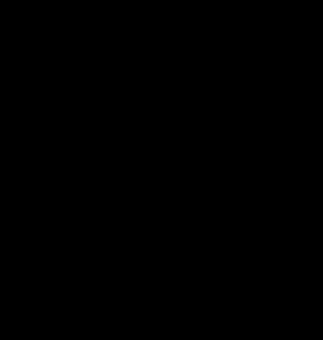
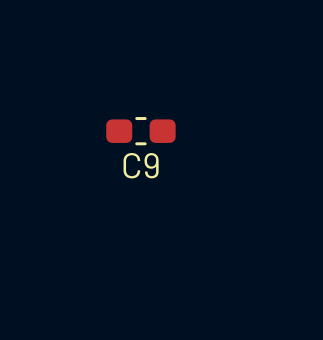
C9: none -> (140, 131)

